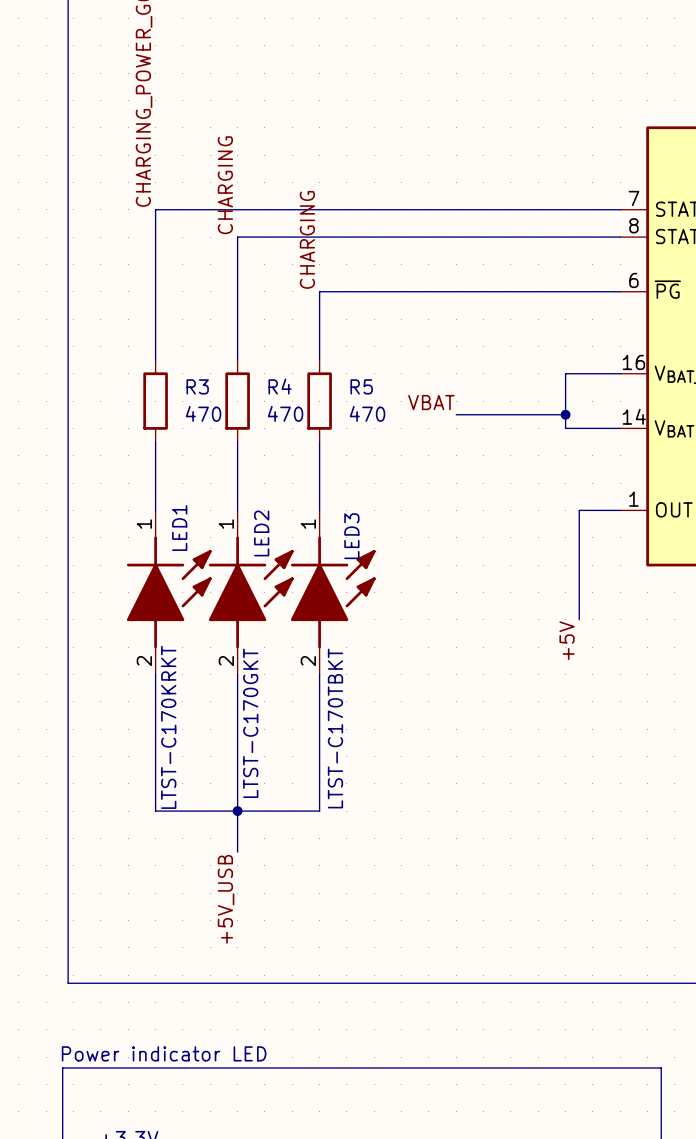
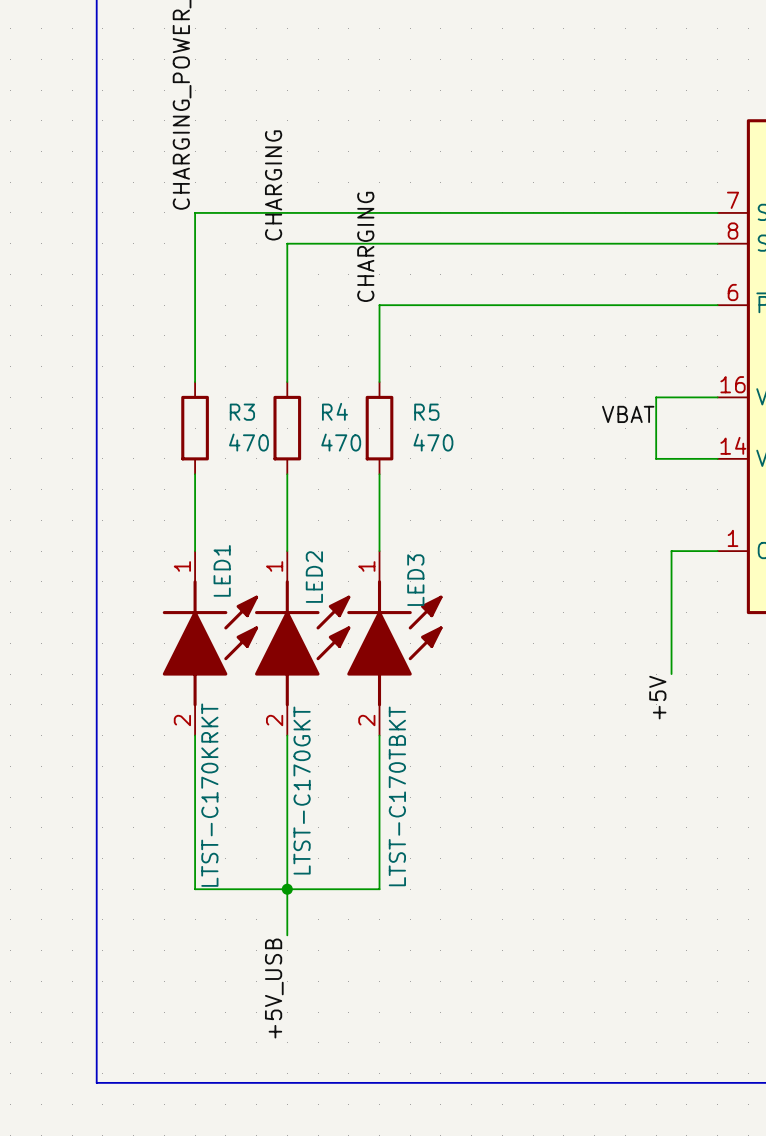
label position: VBAT (431, 402) -> VBAT (628, 414)
wire: (456, 414) (565, 414) -> none
junction: (565, 414) -> none

